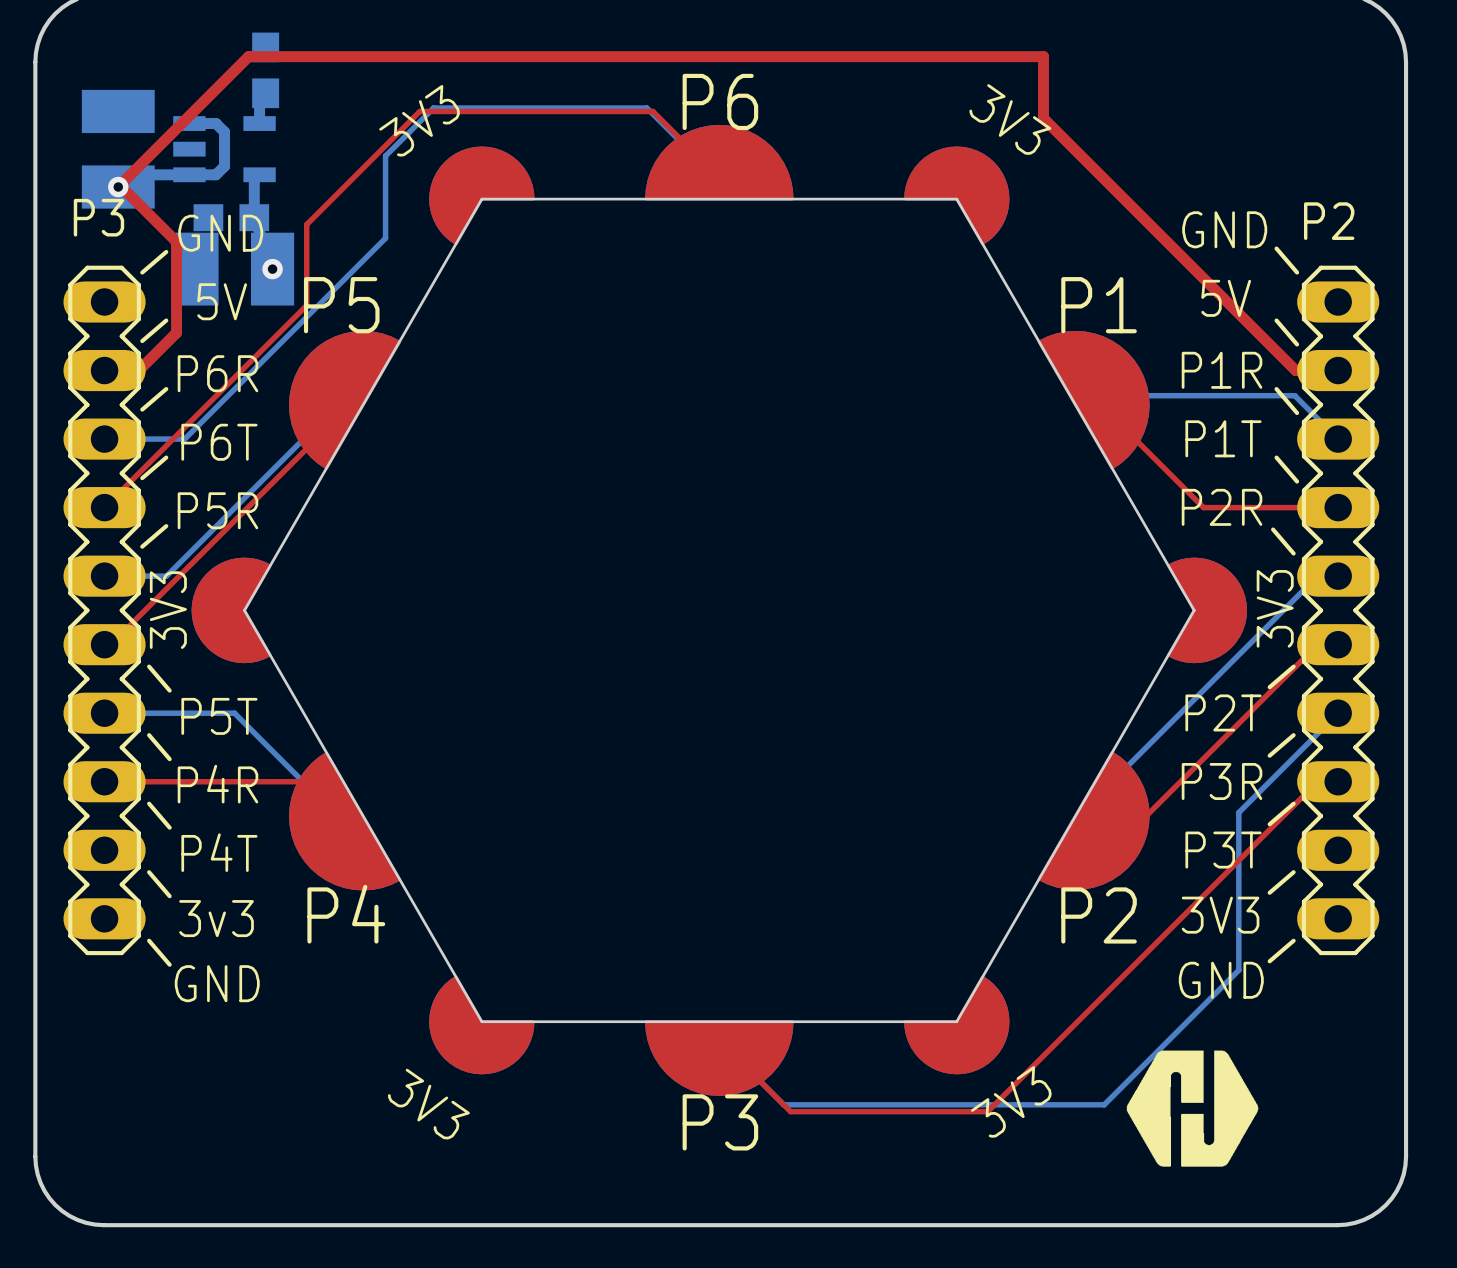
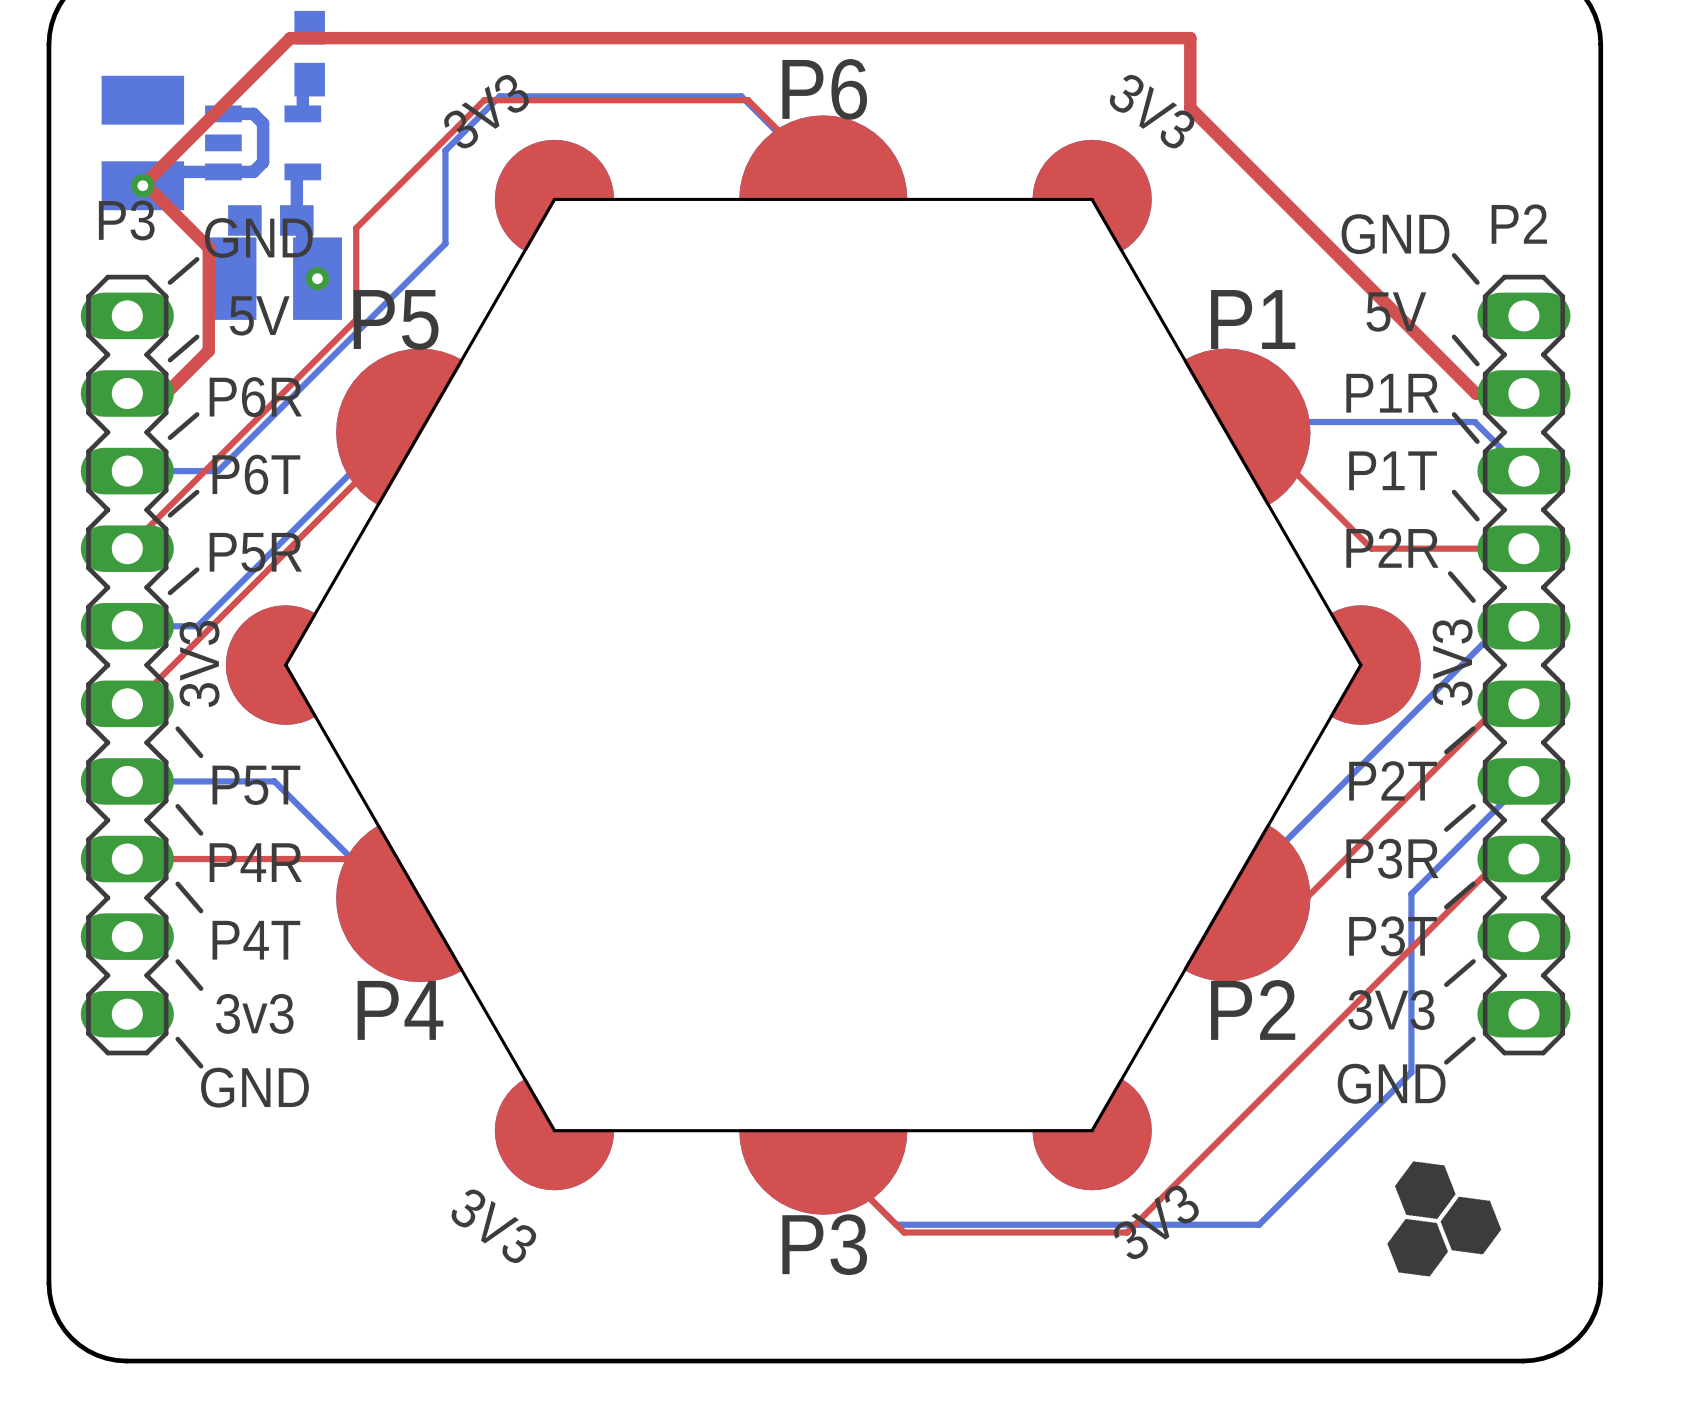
drawing: none -> [1387, 1161, 1502, 1277]
drawing: [1126, 1050, 1259, 1167] -> none

